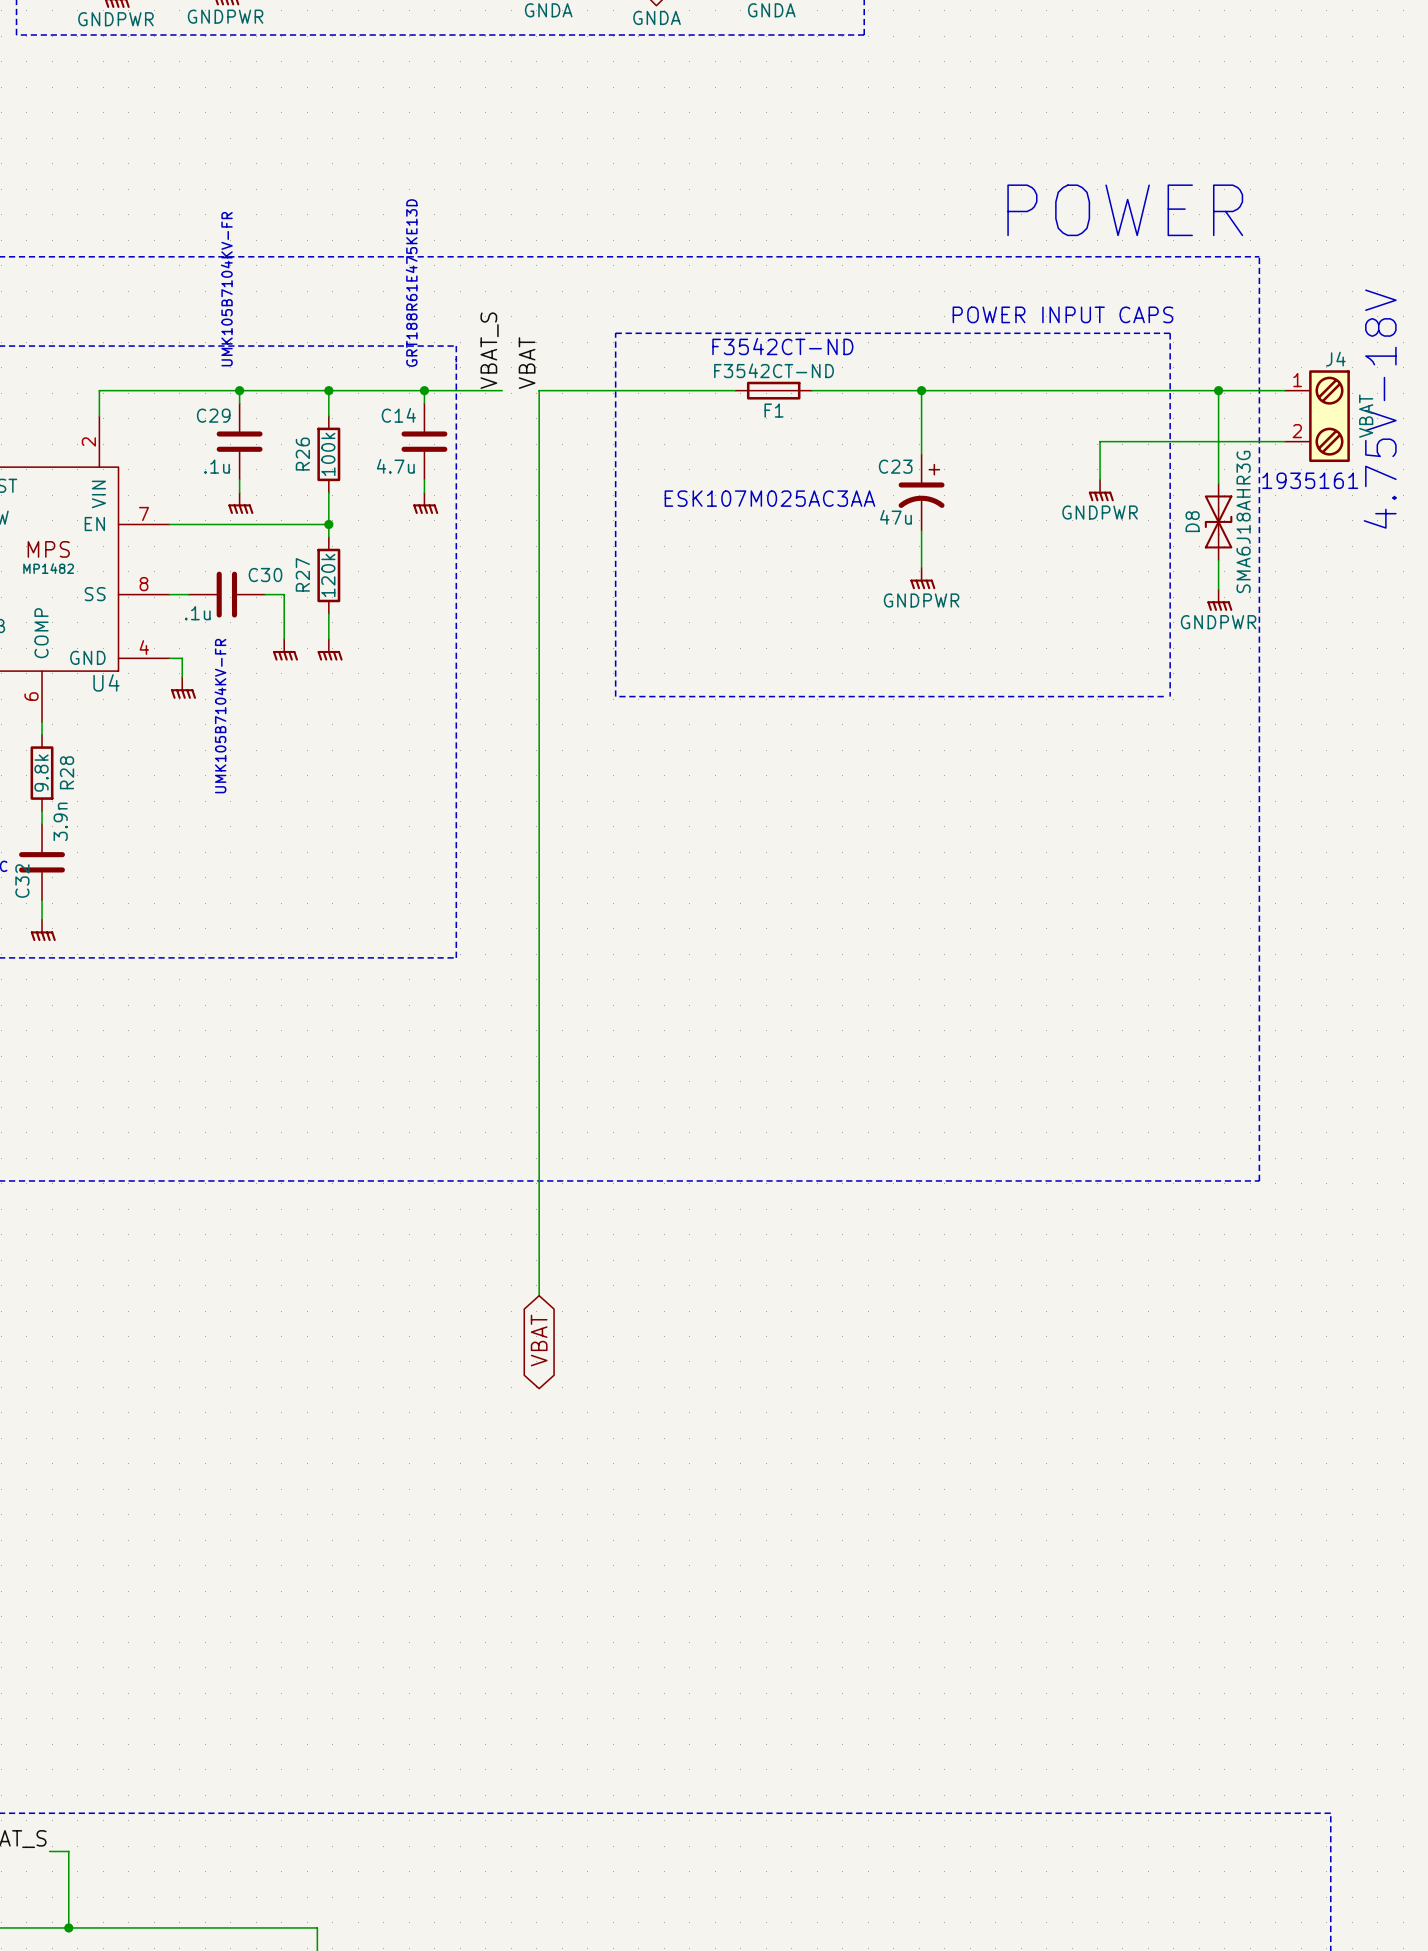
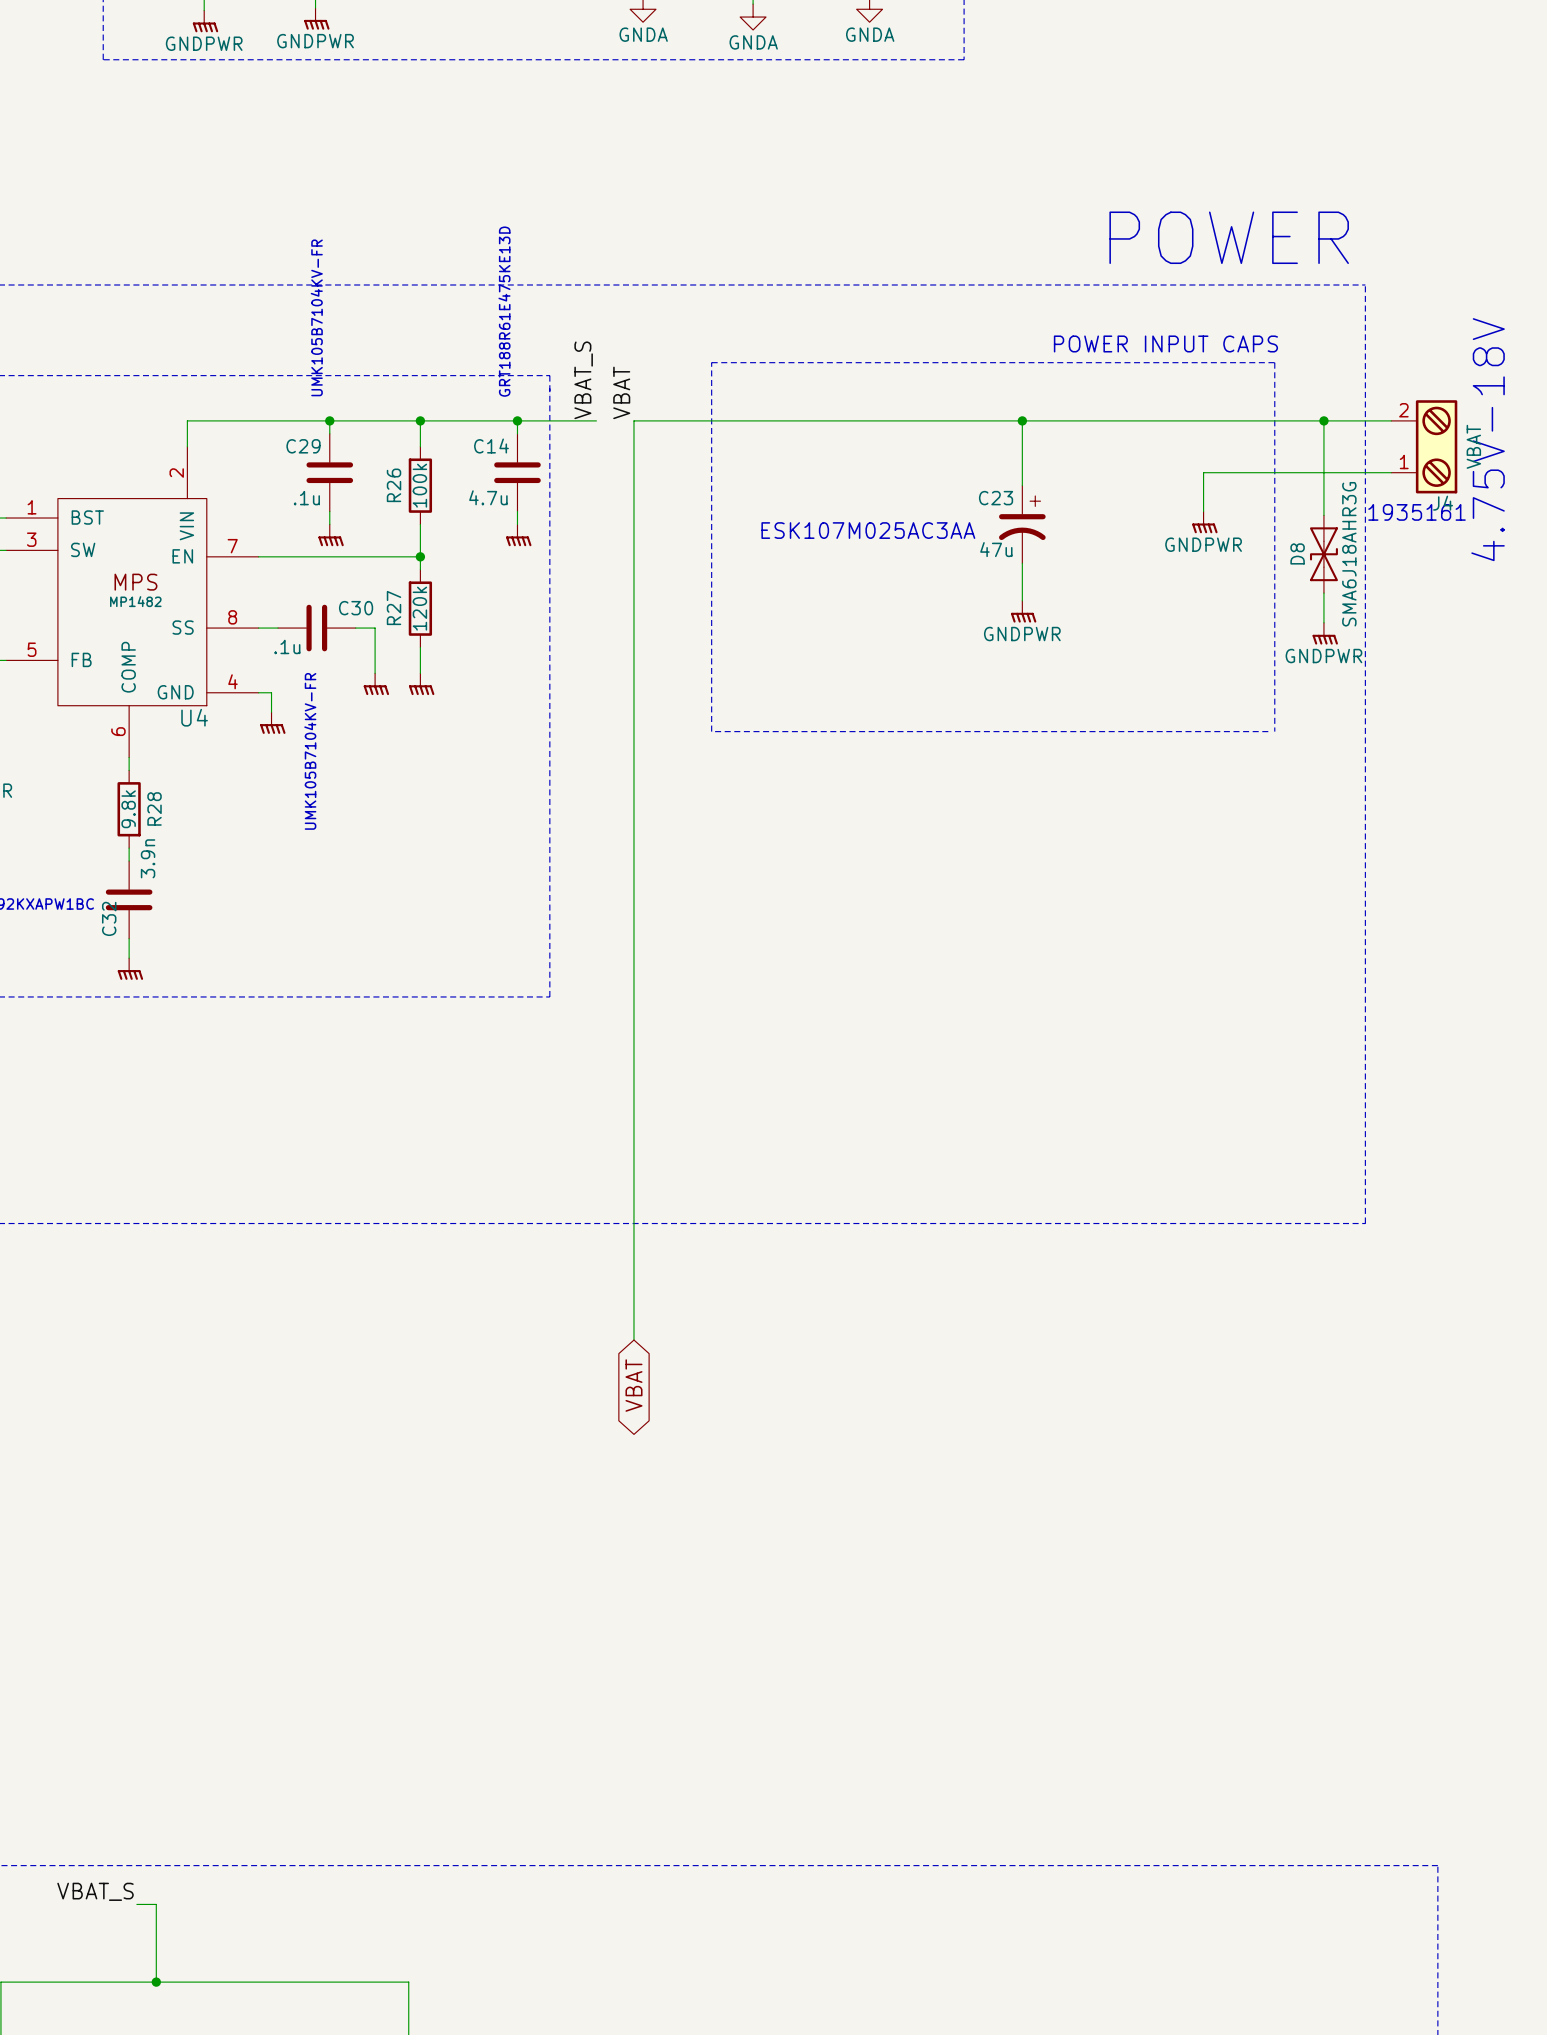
text: F3542CT-ND (782, 346) -> none
F1: F3542CT-ND (773, 390) -> none
J4 flip: as is (1329, 416) -> up-down (1436, 446)

